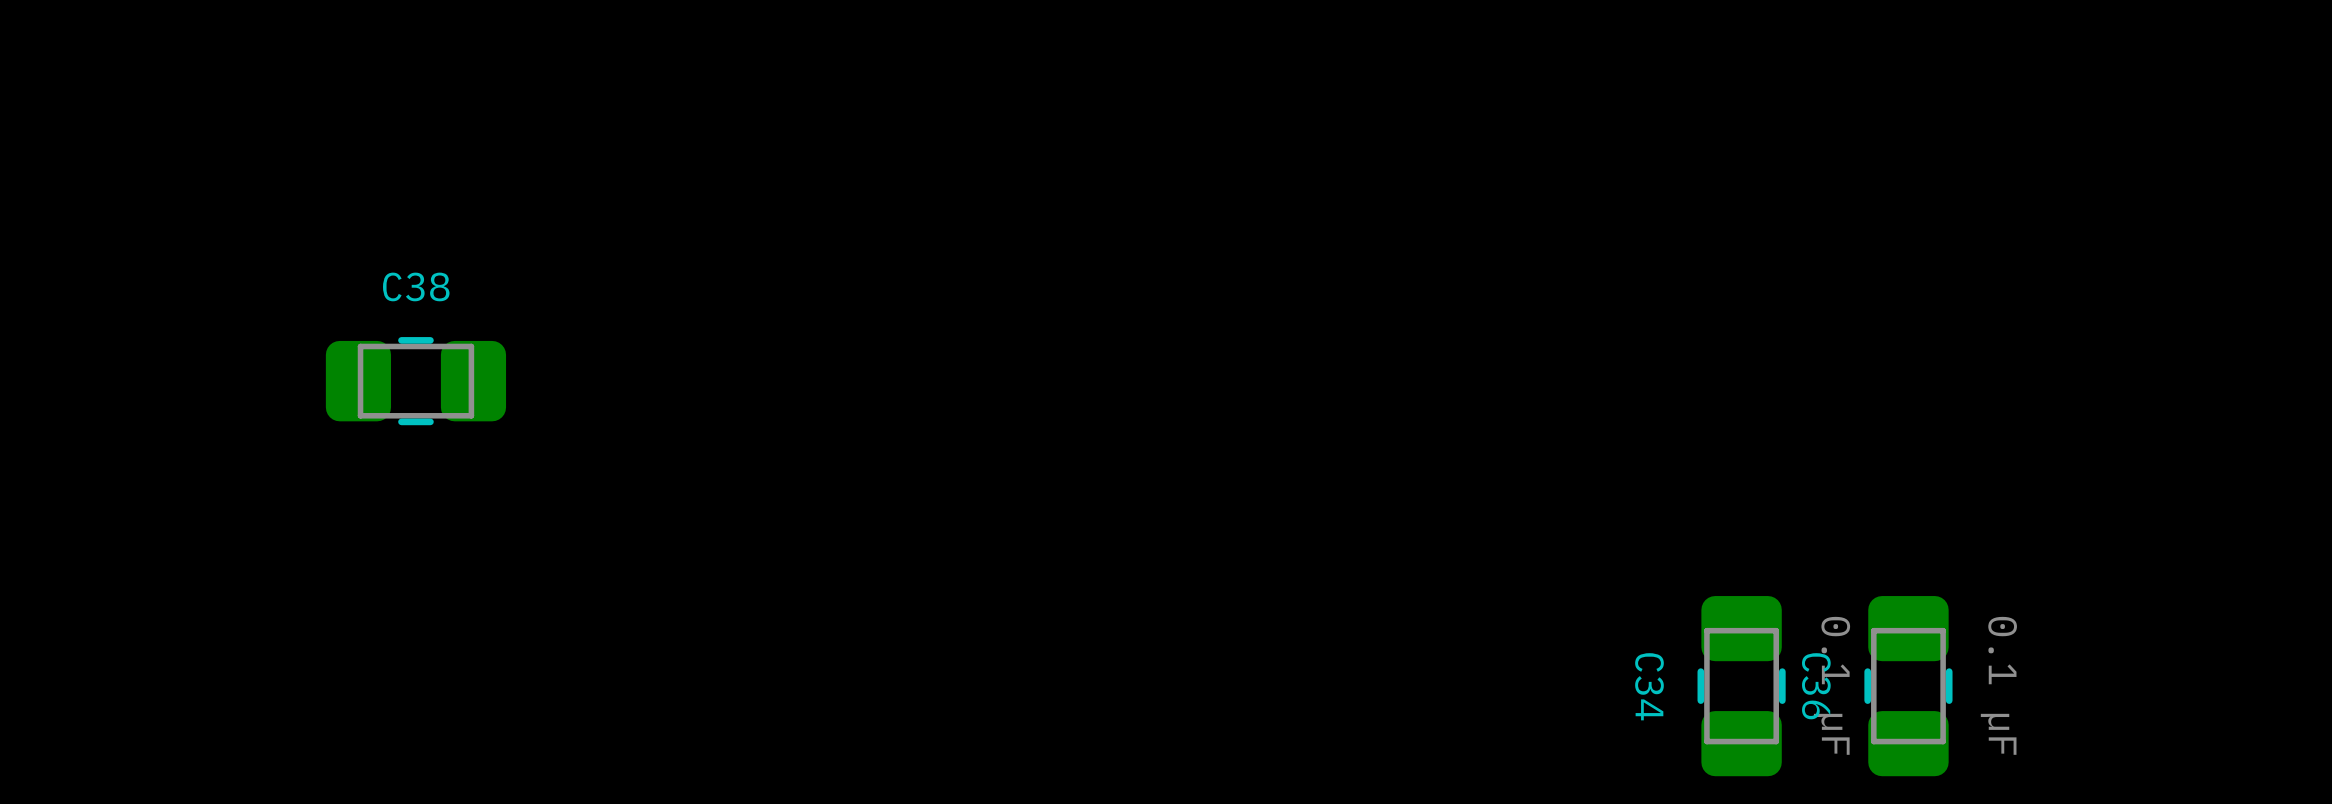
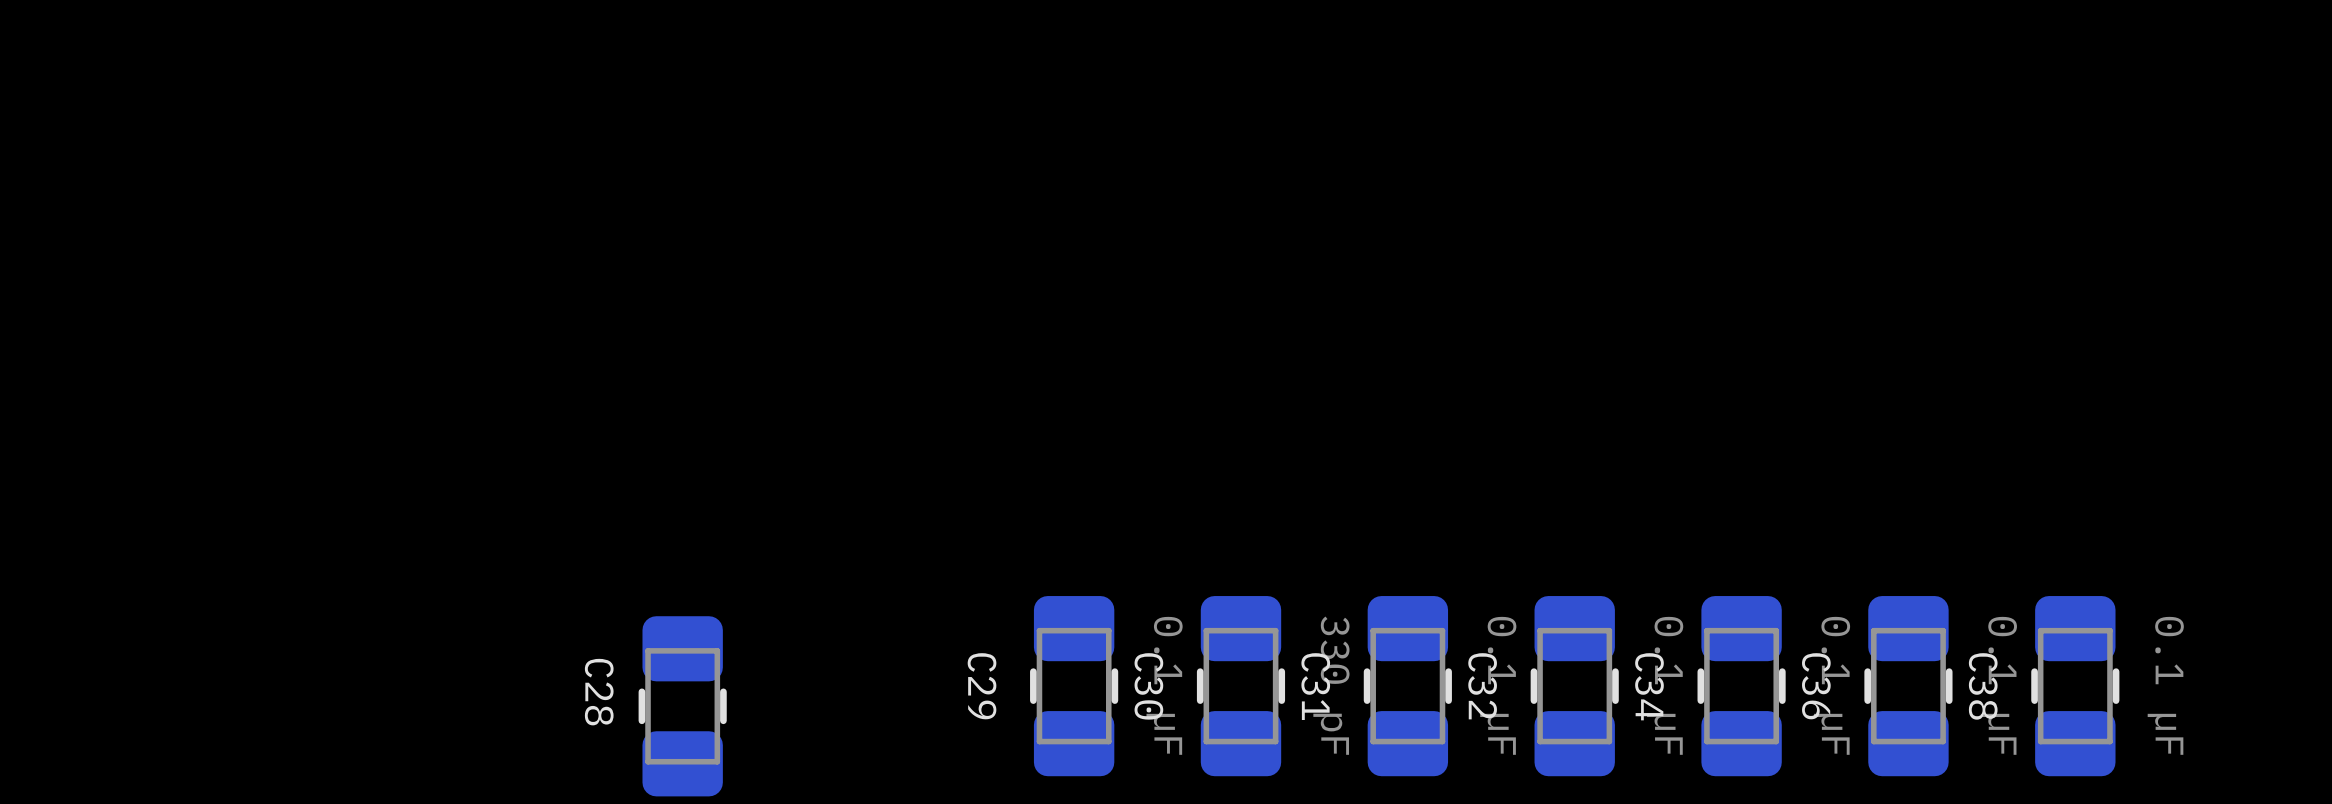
C38 name position: C38 (416, 286) -> C38 (1983, 686)
C38 rotation: 0° (415, 381) -> 90° clockwise (2075, 686)
C38 position: (415, 381) -> (2075, 686)
C38 value: none -> 0.1 µF (2165, 685)
C29: none -> 0.1 µF (1074, 686)
C30: none -> 330 pF (1240, 686)
C31: none -> 0.1 µF (1407, 686)
C32: none -> 0.1 µF (1574, 686)
C28: none -> (682, 706)

